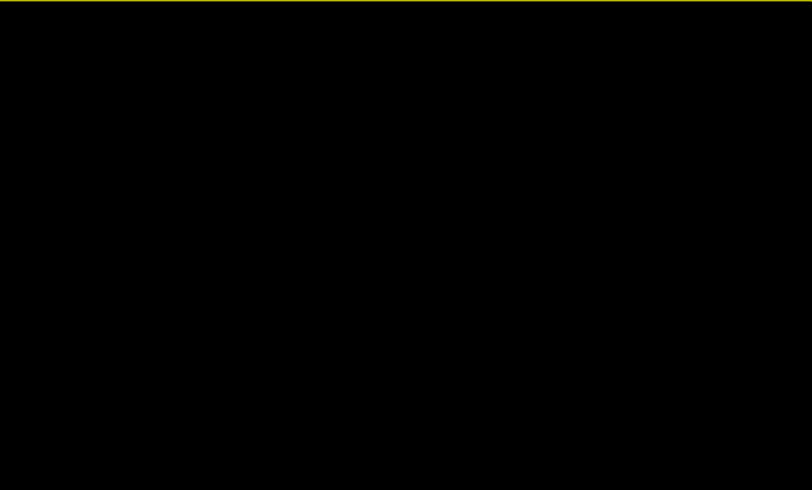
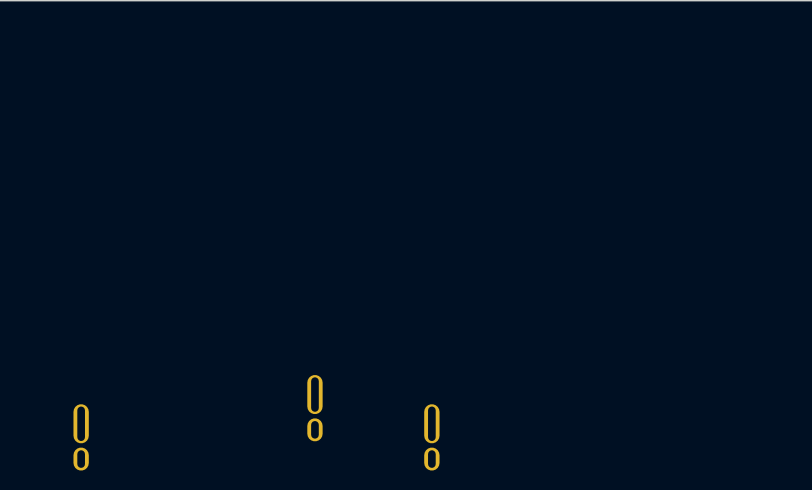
part: none -> (314, 408)
part: none -> (81, 437)
part: none -> (431, 437)

